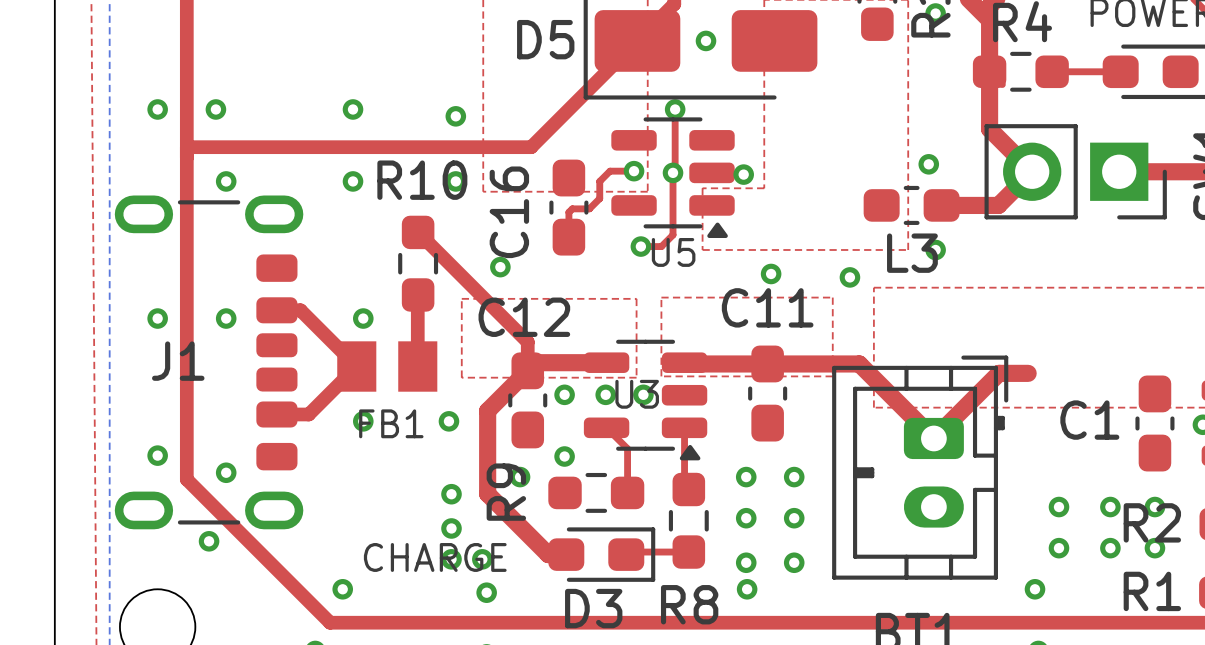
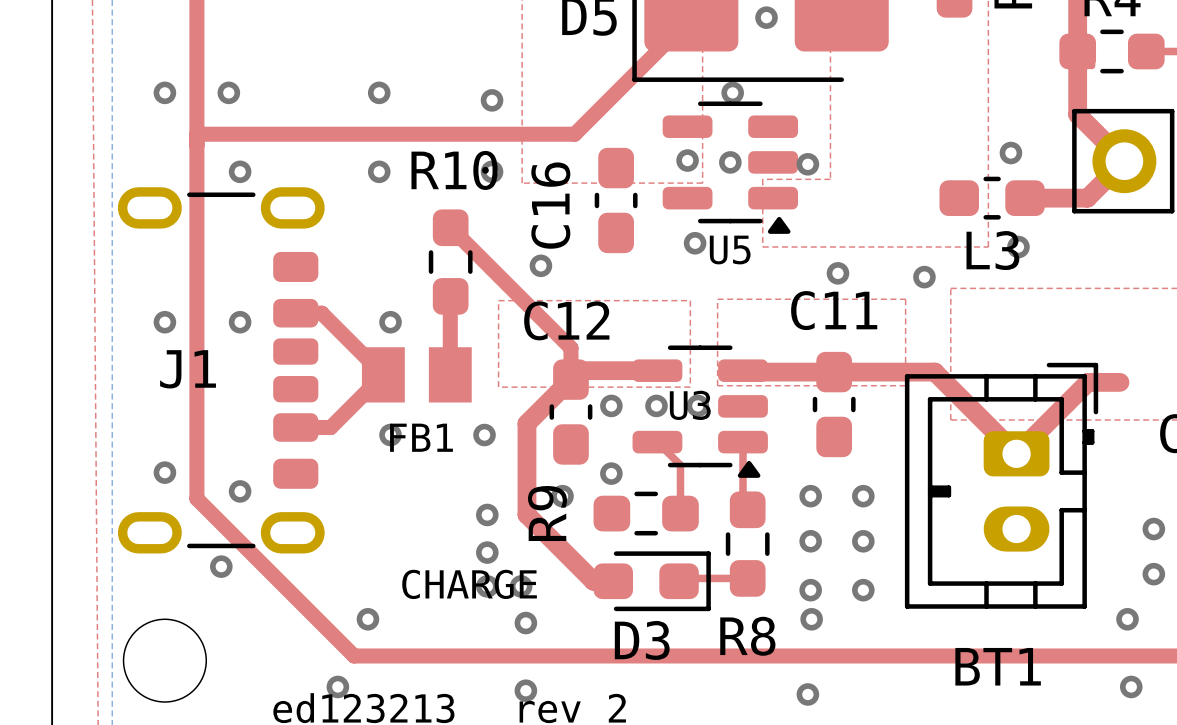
top track: (675, 109) (673, 234) (661, 246) (640, 246) -> none
top track: (634, 171) (610, 171) (599, 181) (599, 198) (589, 208) (572, 208) (568, 212) (568, 237) -> none

